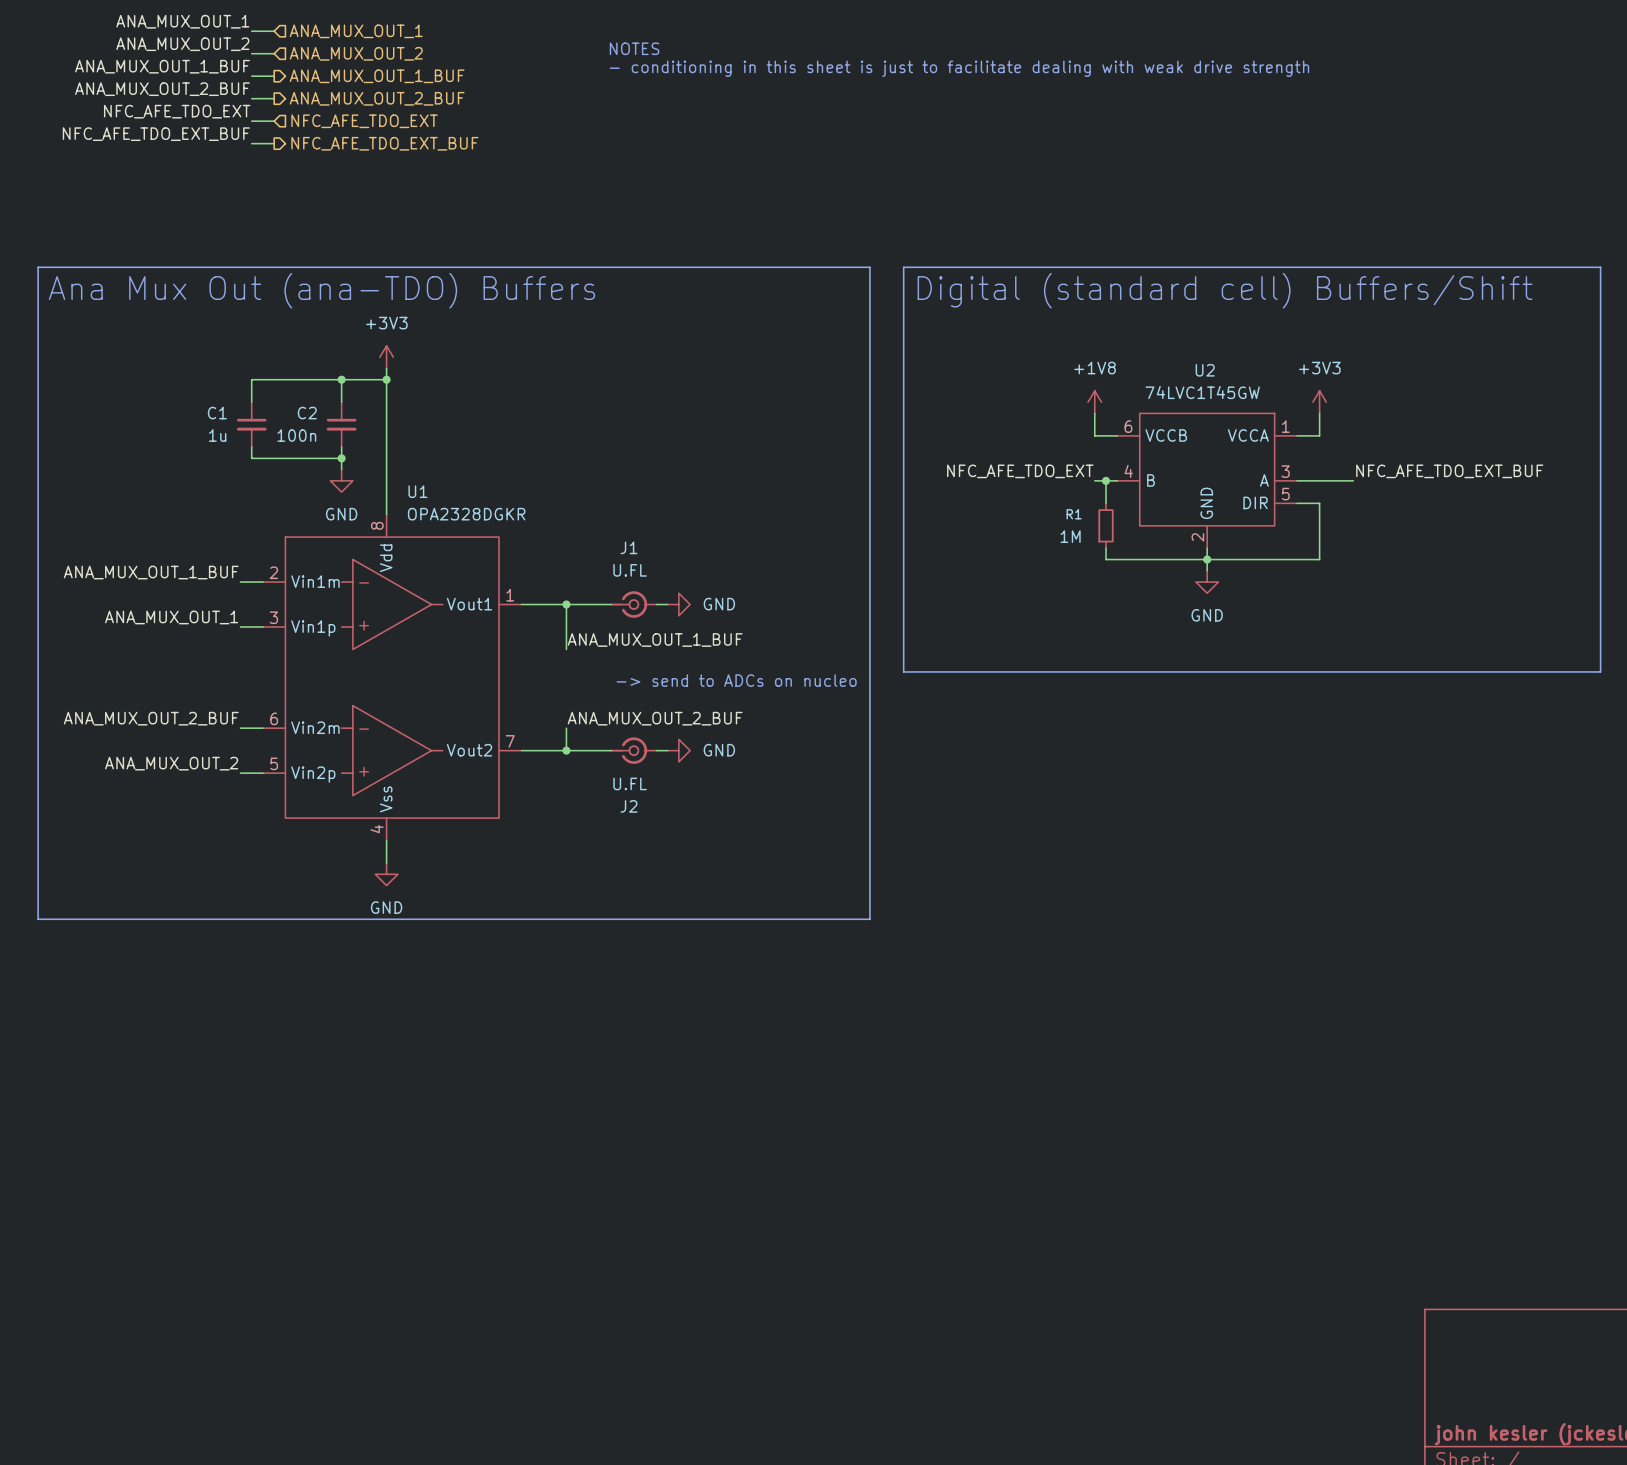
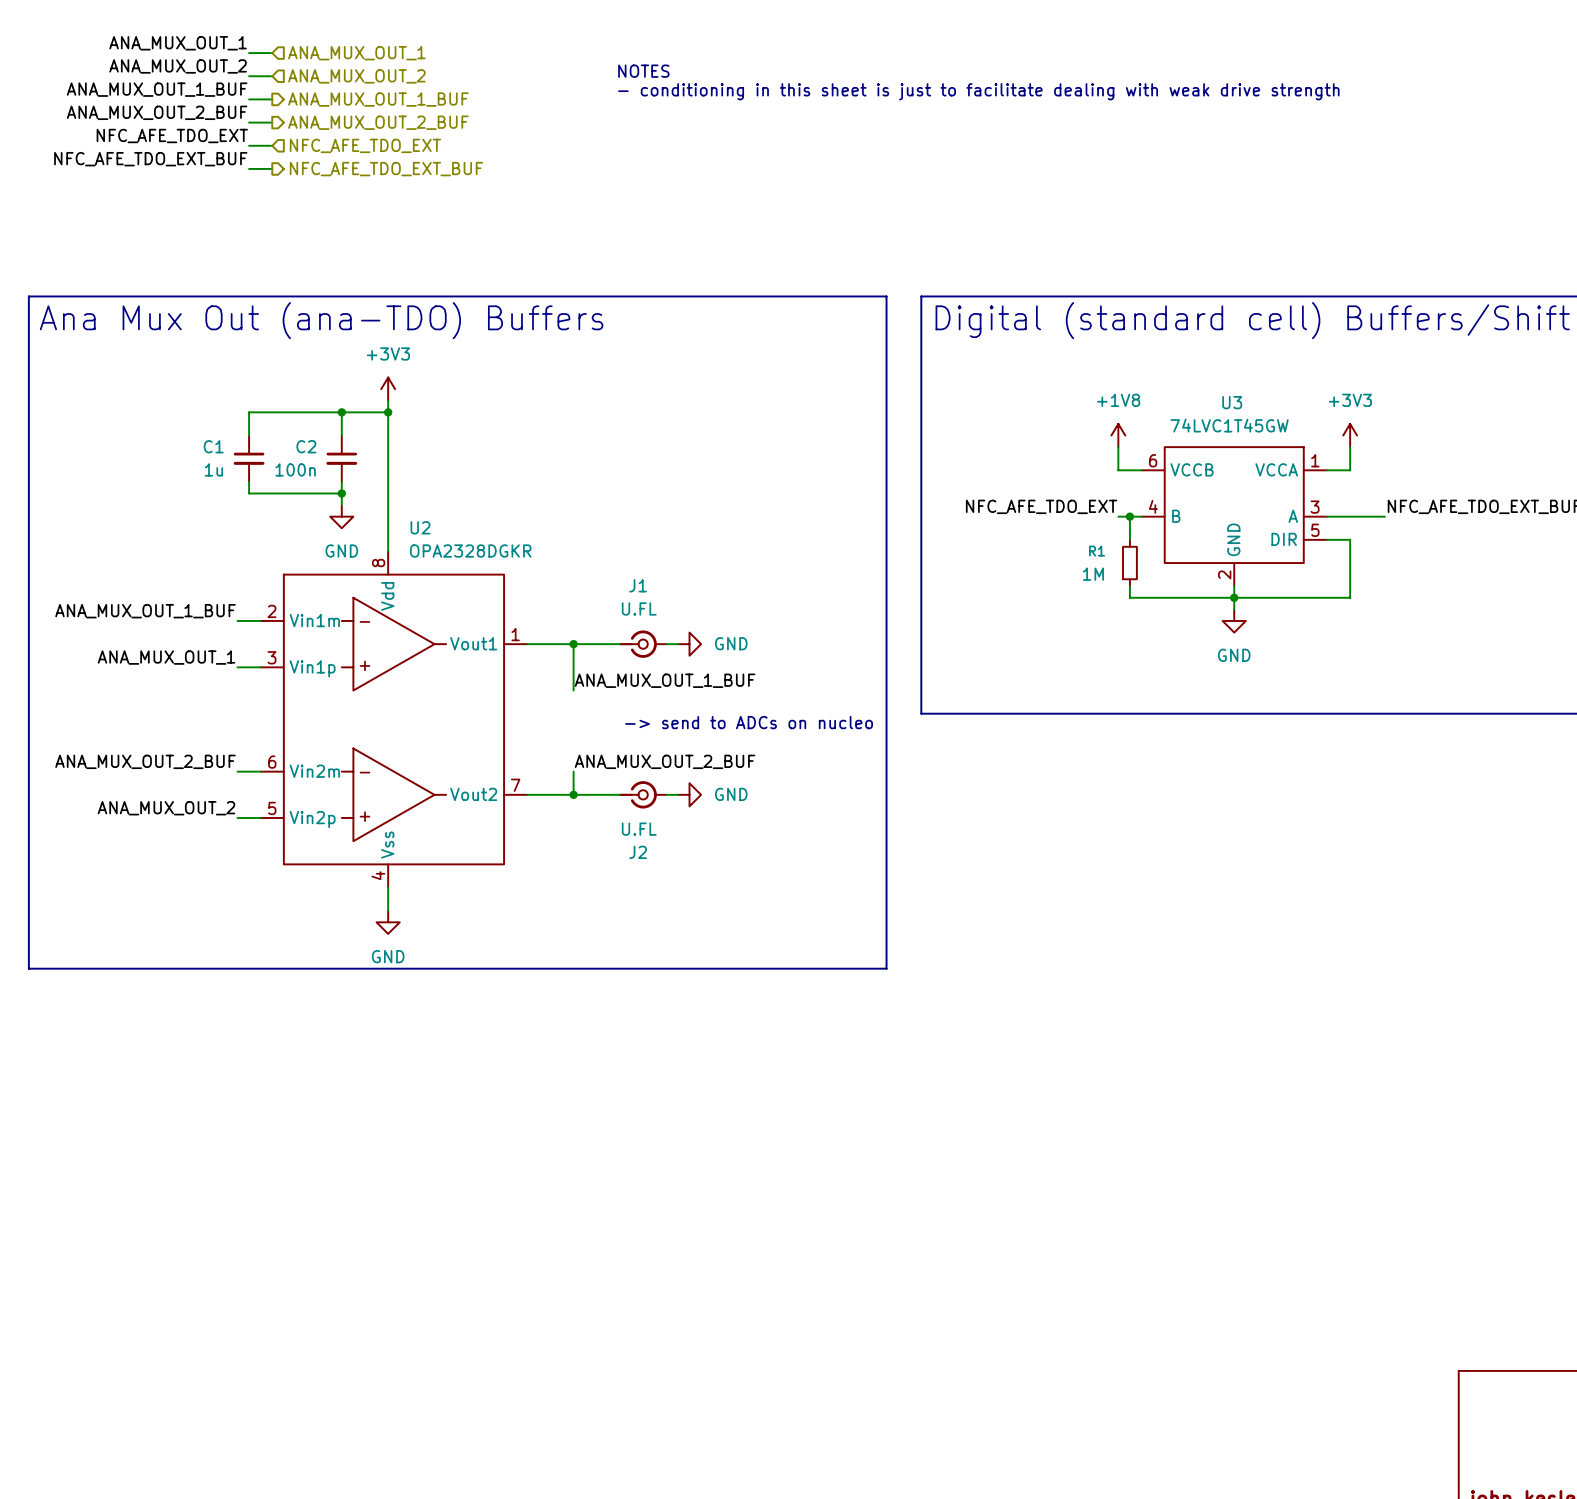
U2 name: U2 (1205, 370) -> U3 (1232, 402)
U1 name: U1 (417, 491) -> U2 (420, 527)

